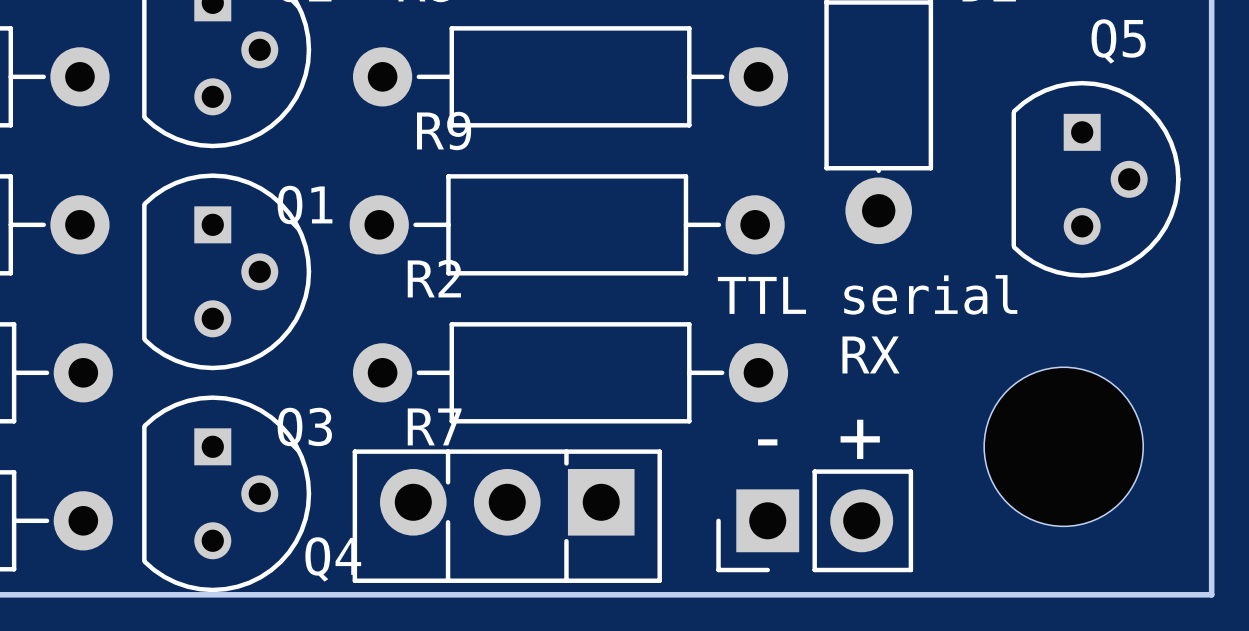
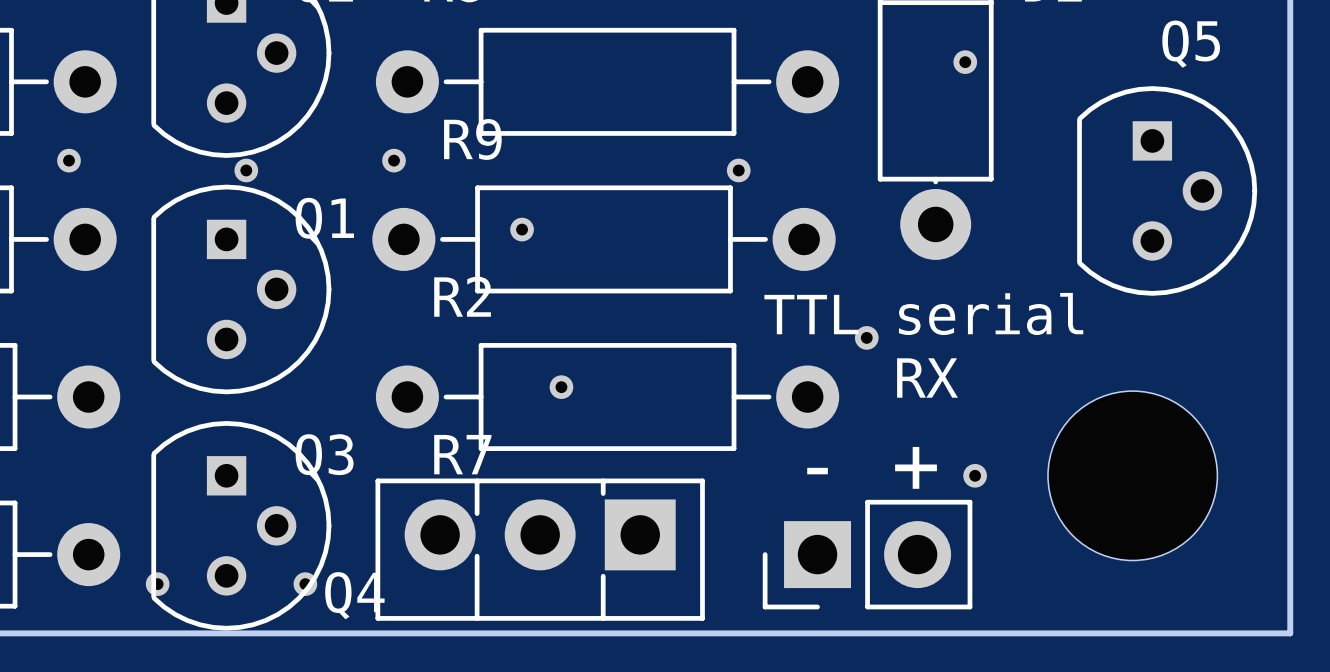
part: none -> (965, 62)
part: none -> (69, 160)
part: none -> (394, 160)
part: none -> (246, 170)
part: none -> (738, 170)
part: none -> (522, 229)
part: none -> (866, 337)
part: none -> (561, 387)
part: none -> (975, 475)
part: none -> (157, 584)
part: none -> (305, 584)

